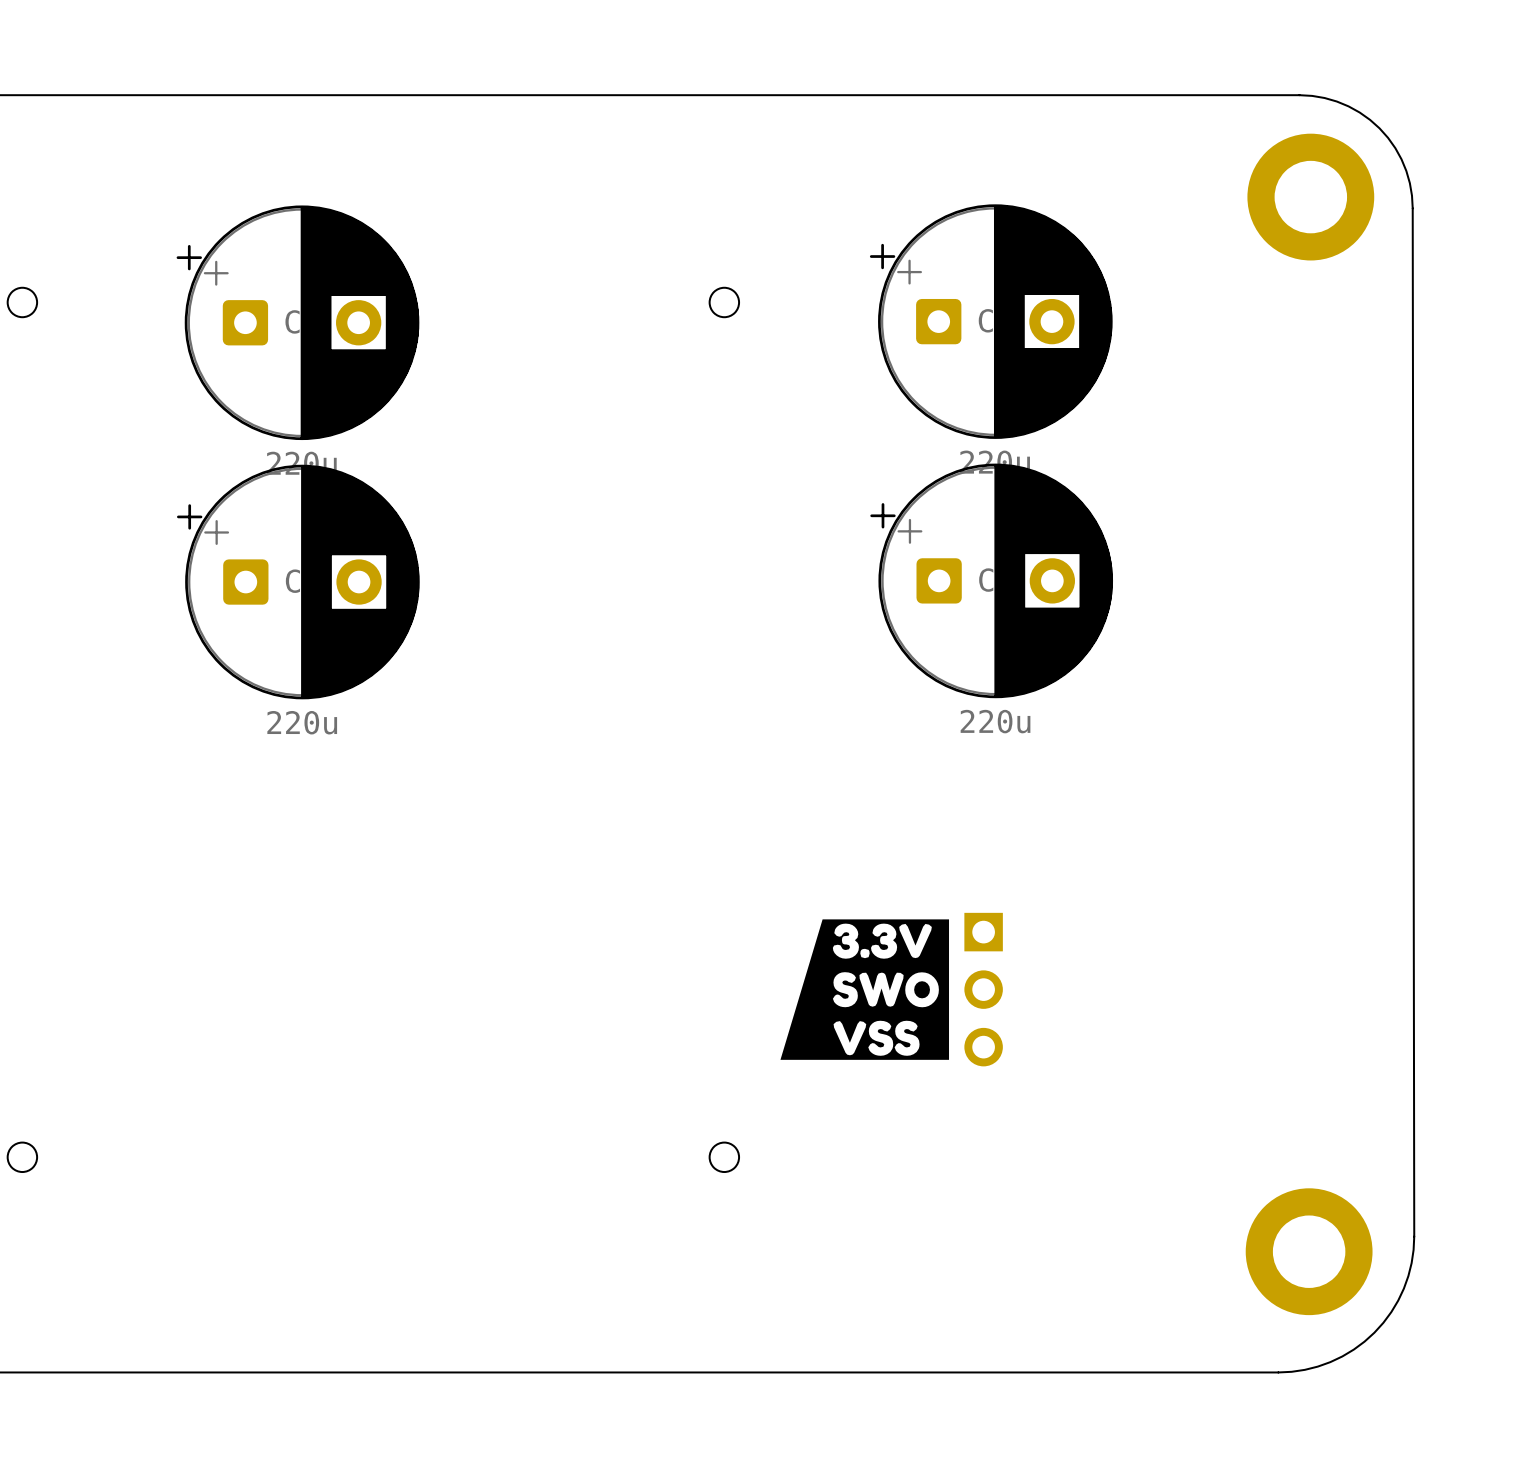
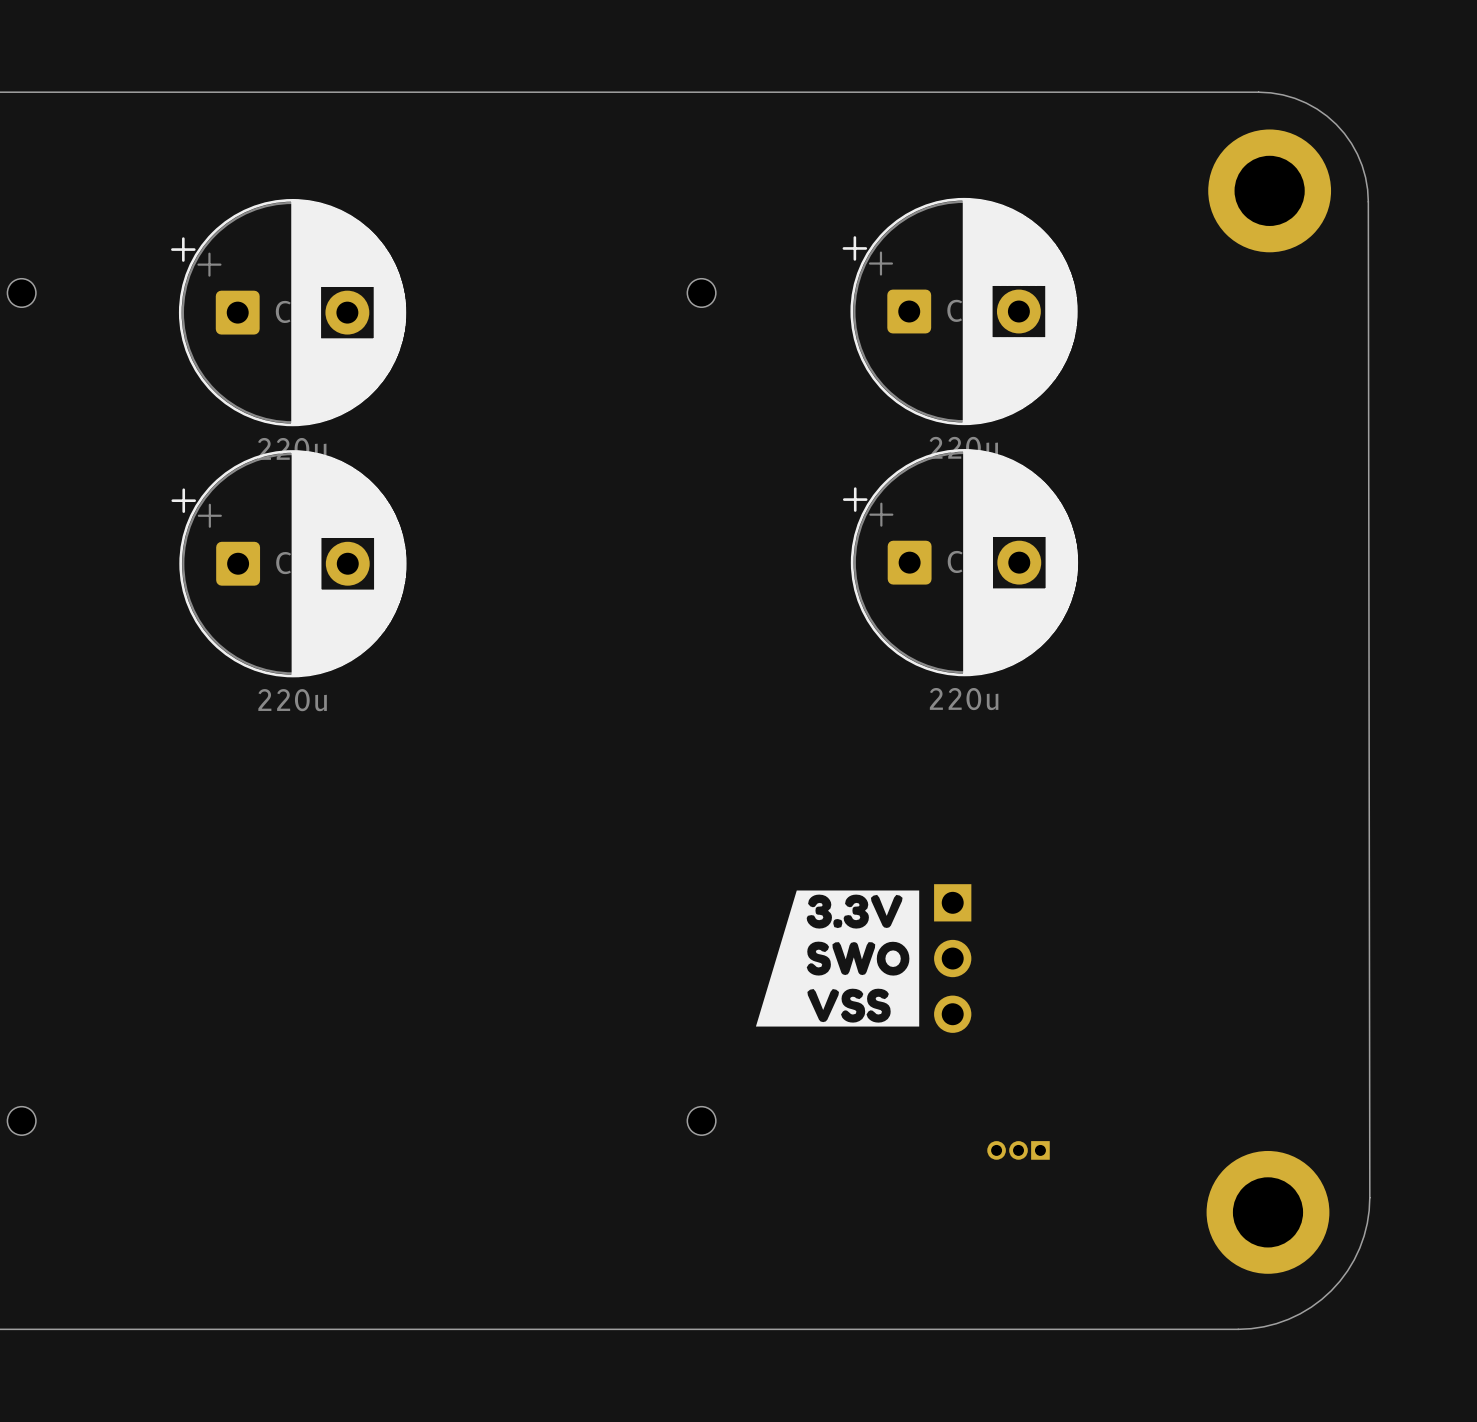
part: none -> (1018, 1150)

